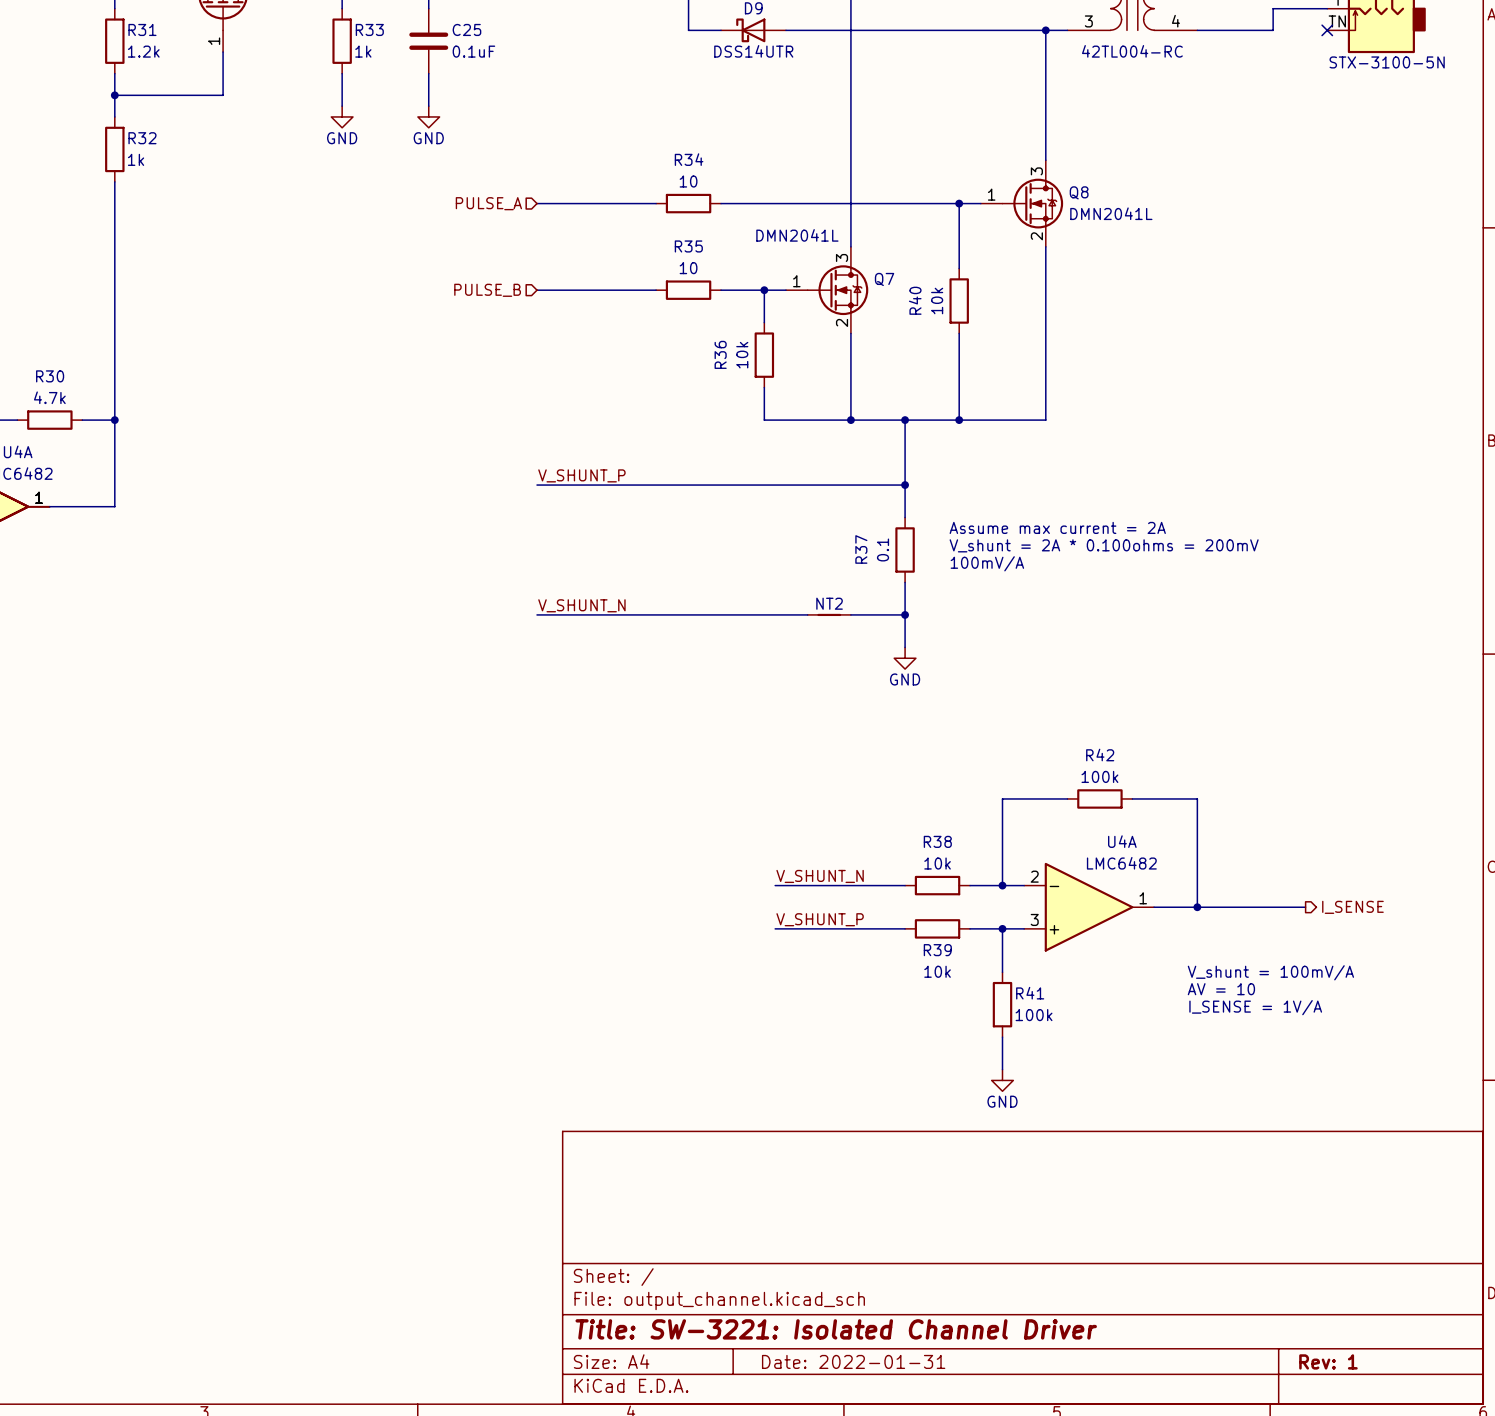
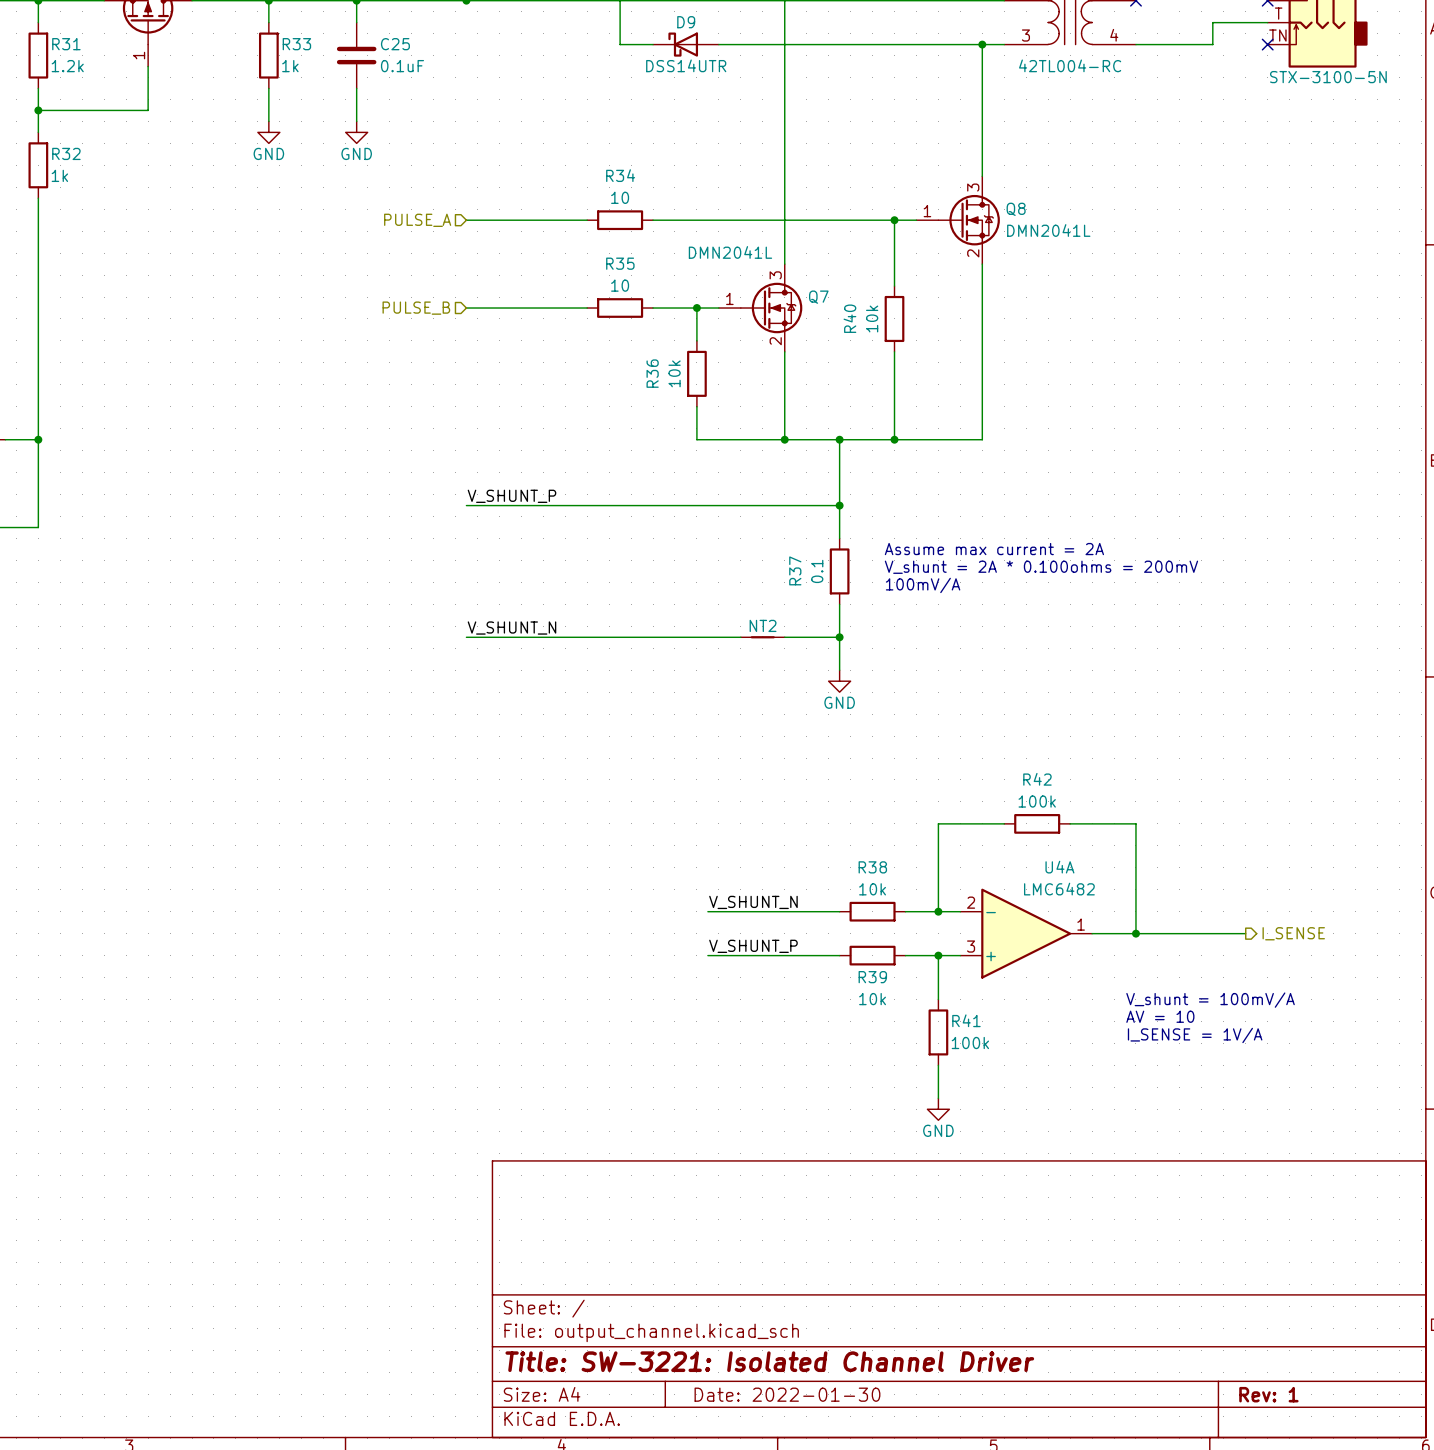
title block: Date: 2022-01-31 (853, 1361) -> Date: 2022-01-30 (787, 1394)

